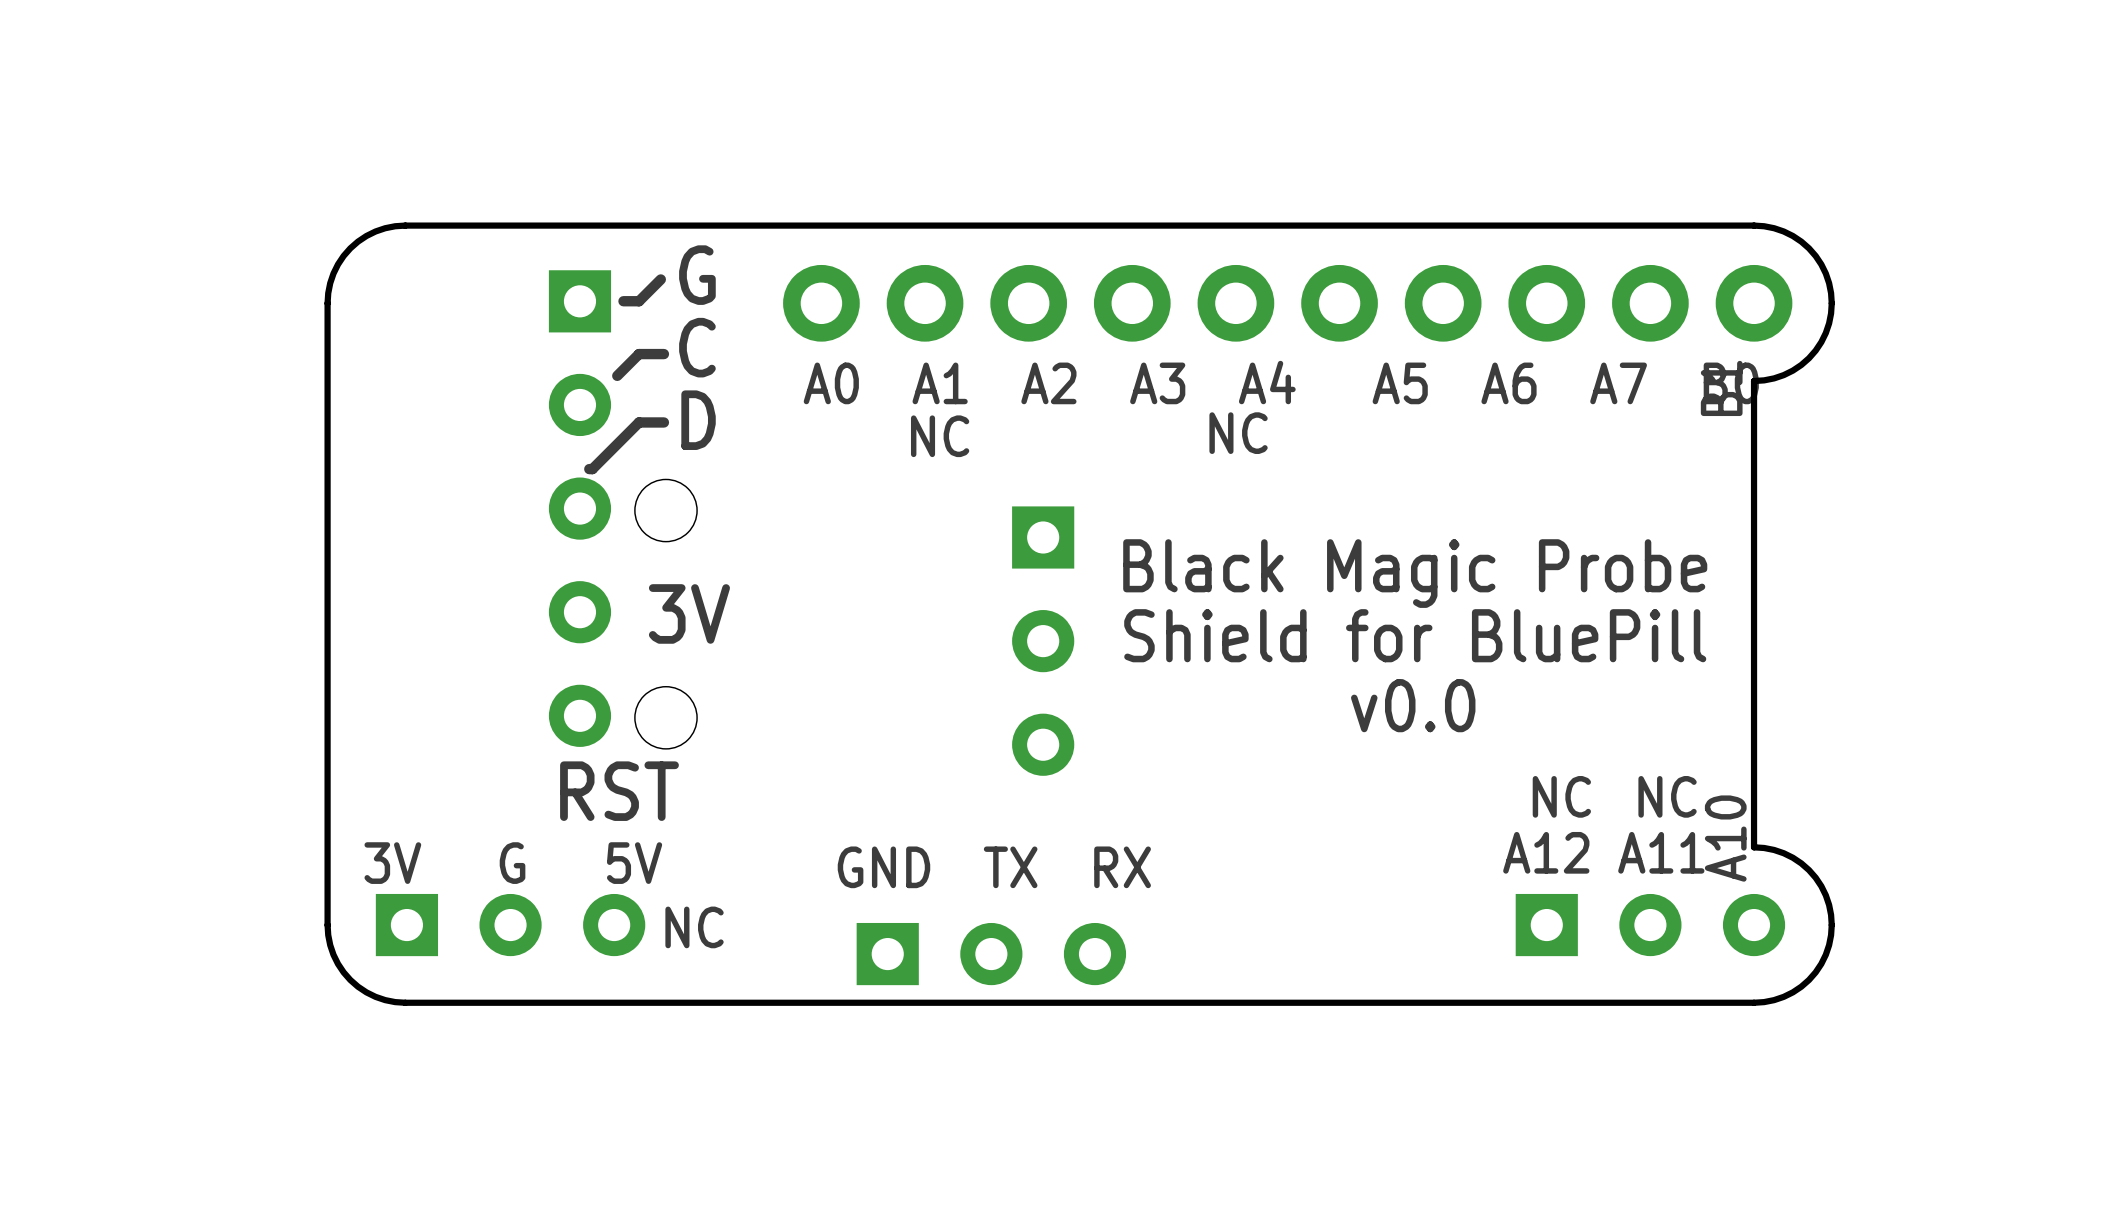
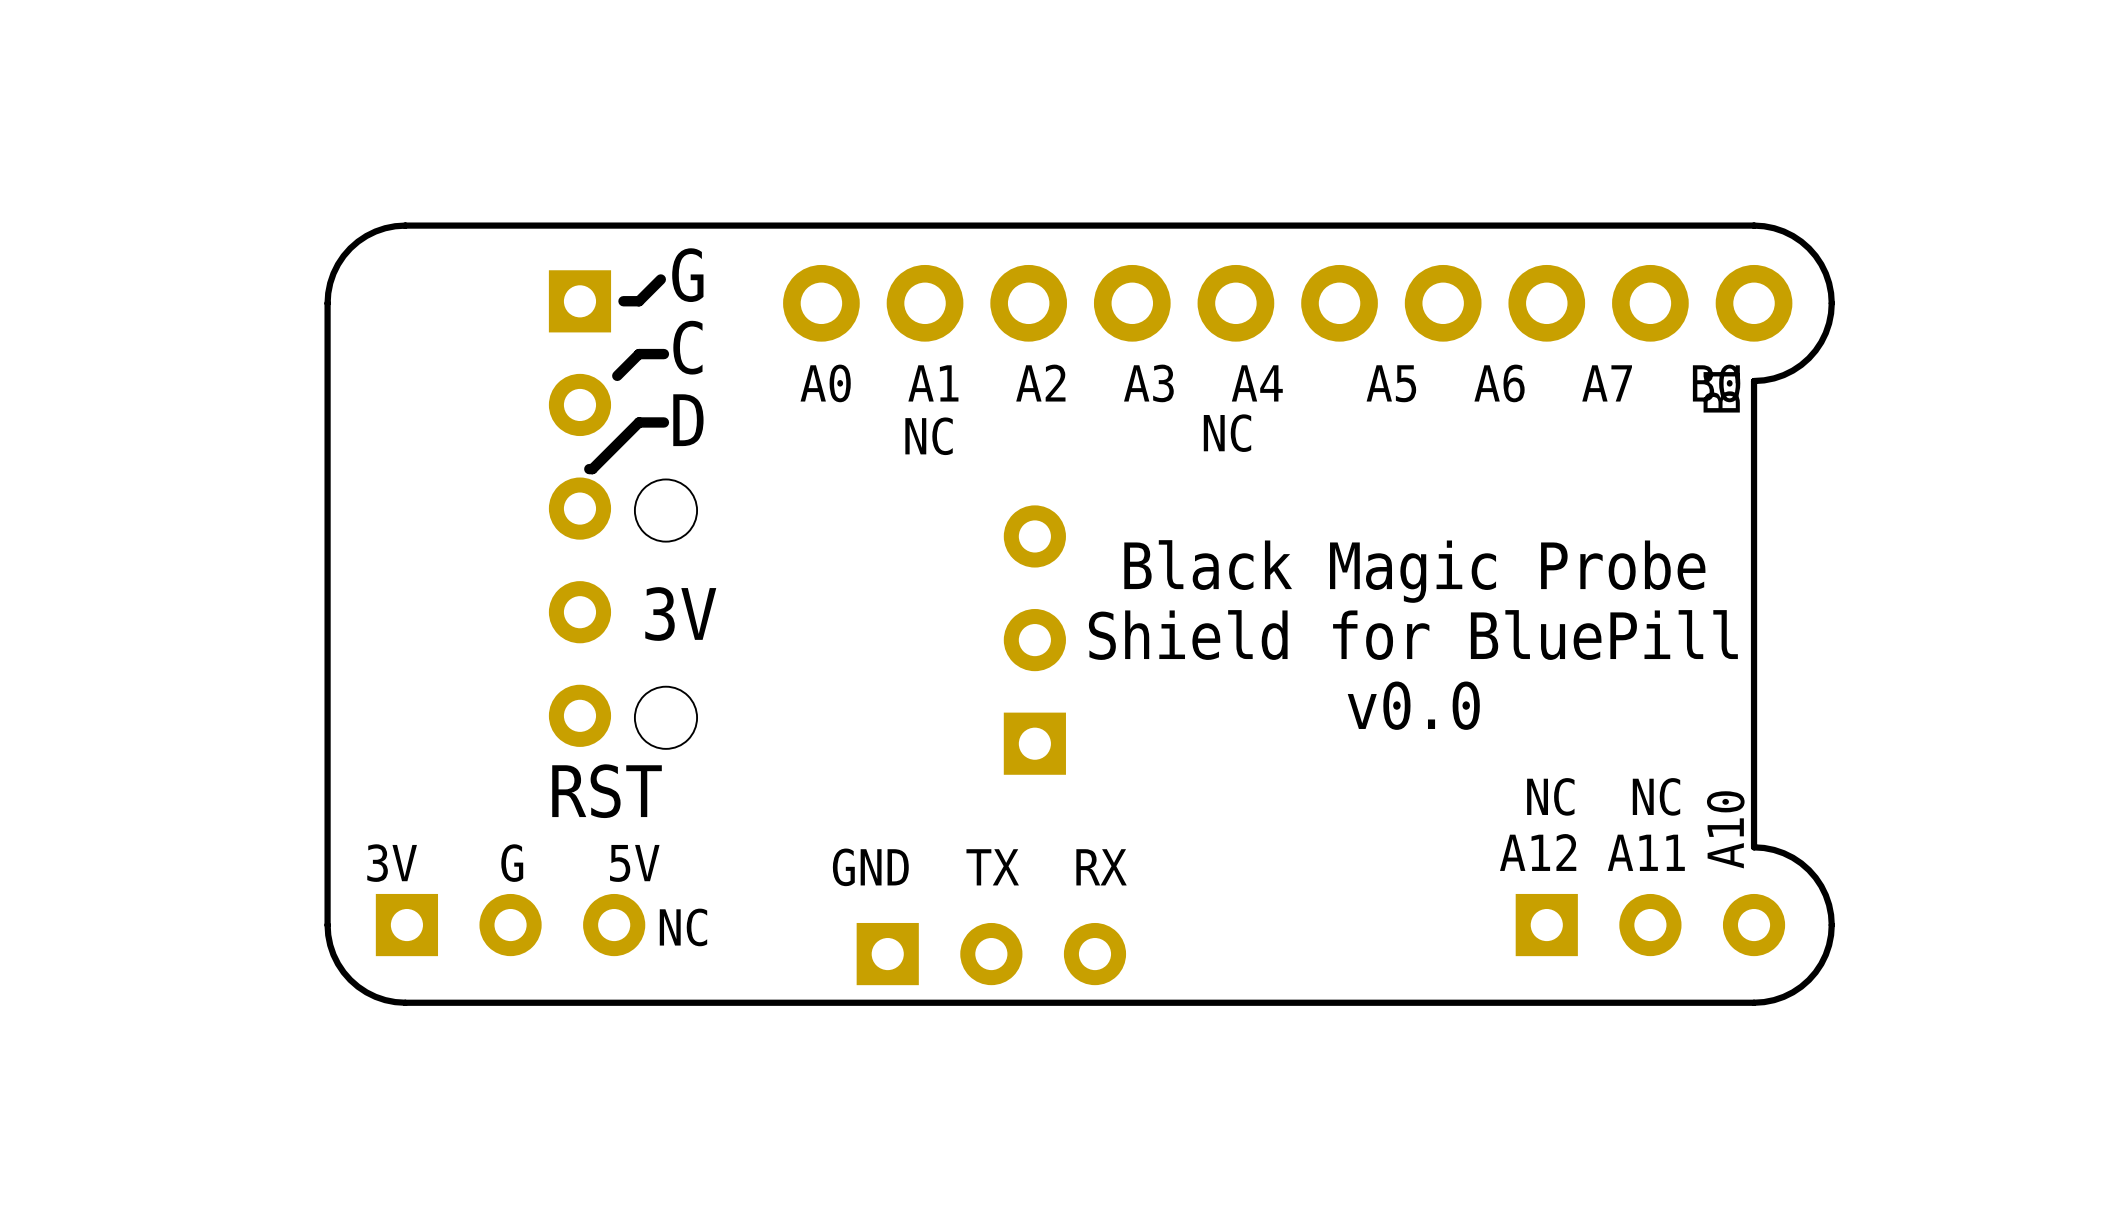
part rotation: 0° (1043, 641) -> 180° (1034, 640)

